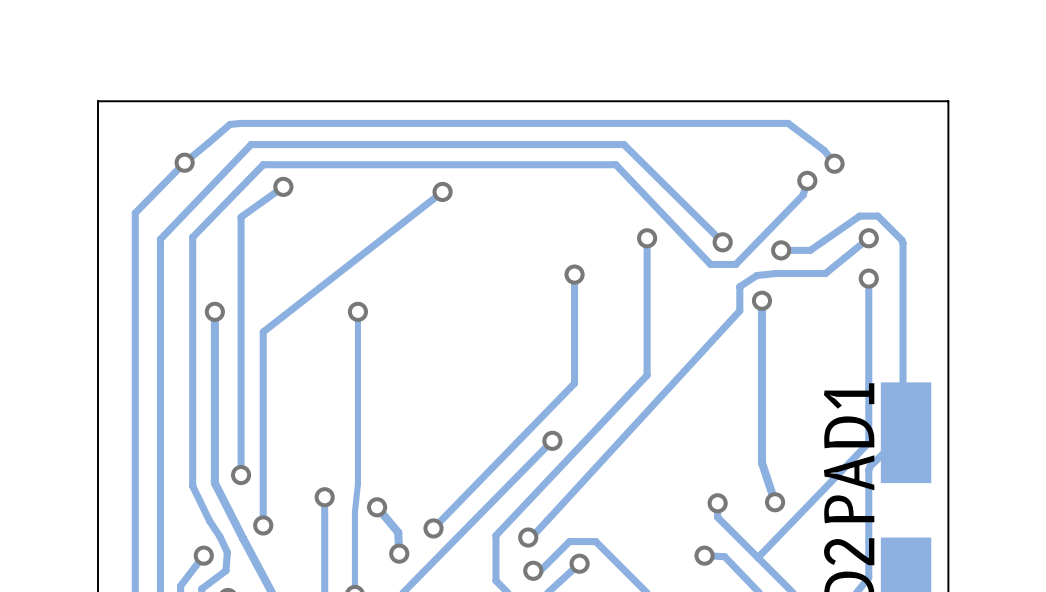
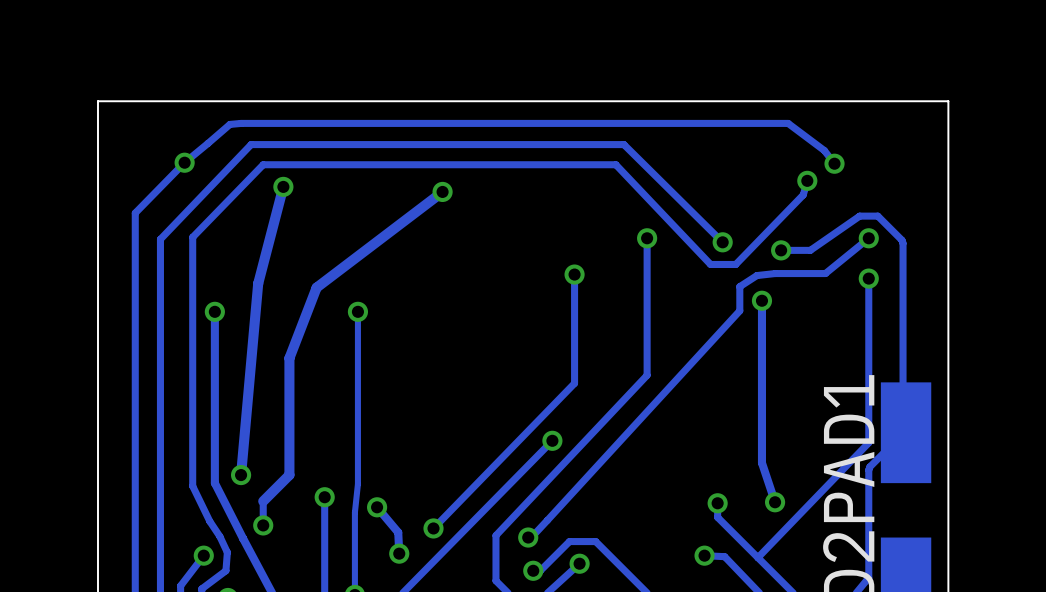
track: (283, 186) (241, 217) (241, 475) -> (283, 186) (258, 283) (241, 475)
track: (442, 191) (263, 331) (263, 501) -> (442, 191) (316, 287) (289, 358) (289, 475) (263, 501)

